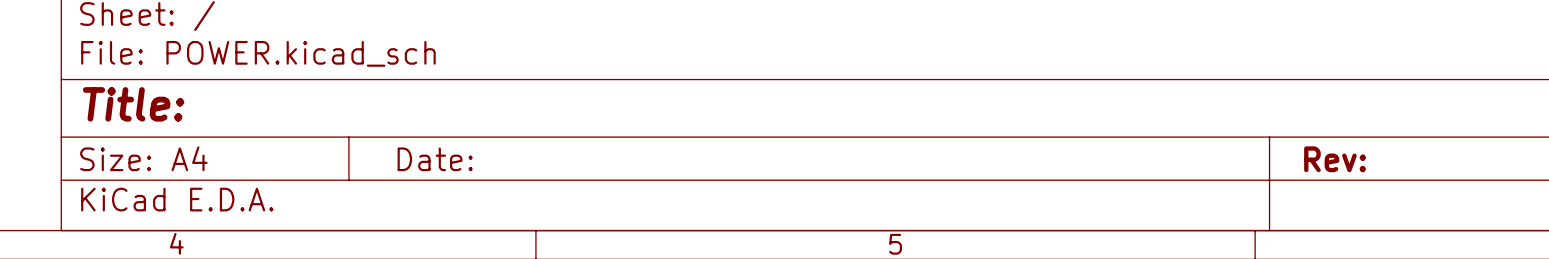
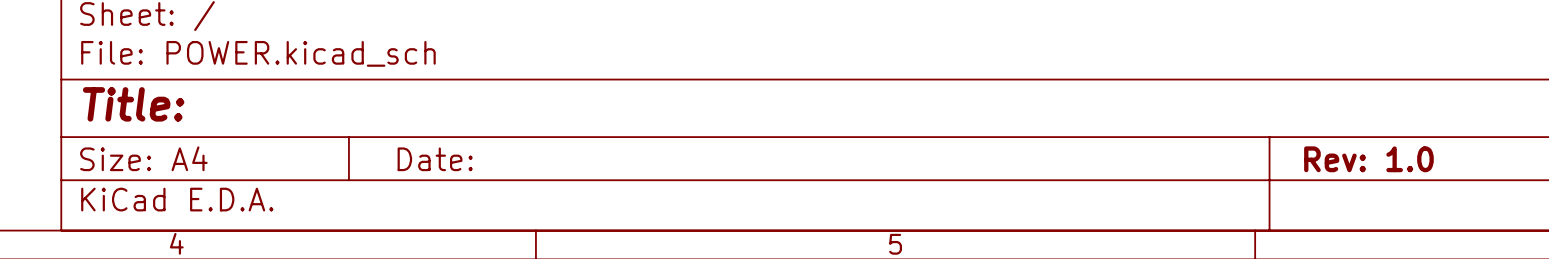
title block: Rev: (1335, 159) -> Rev: 1.0 (1368, 159)

